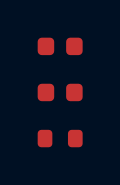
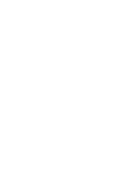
part: (60, 46) -> none
part: (60, 92) -> none
part: (60, 138) -> none

